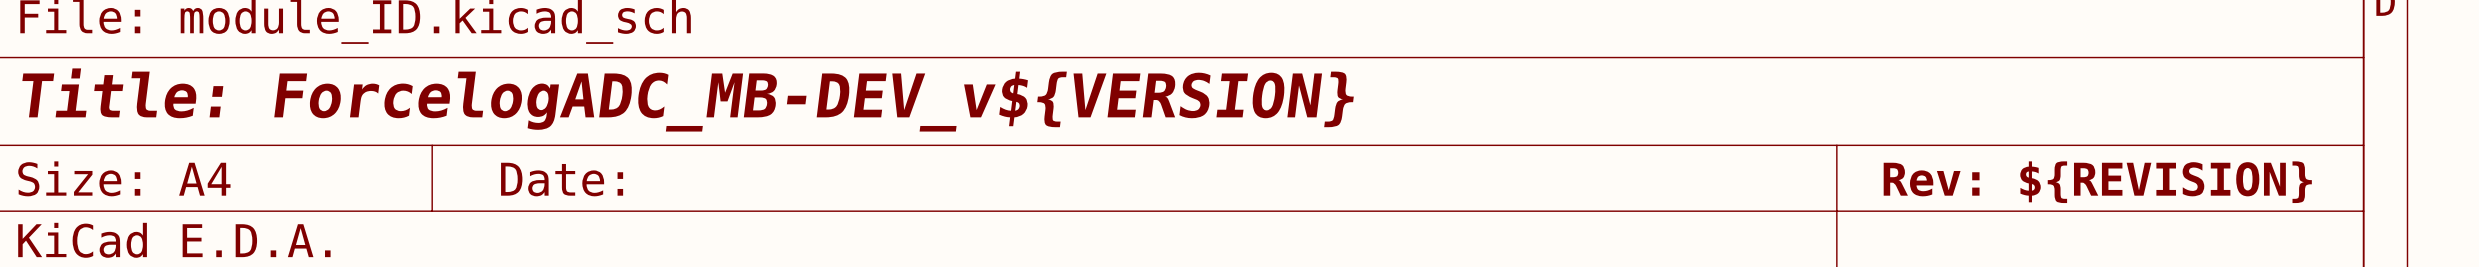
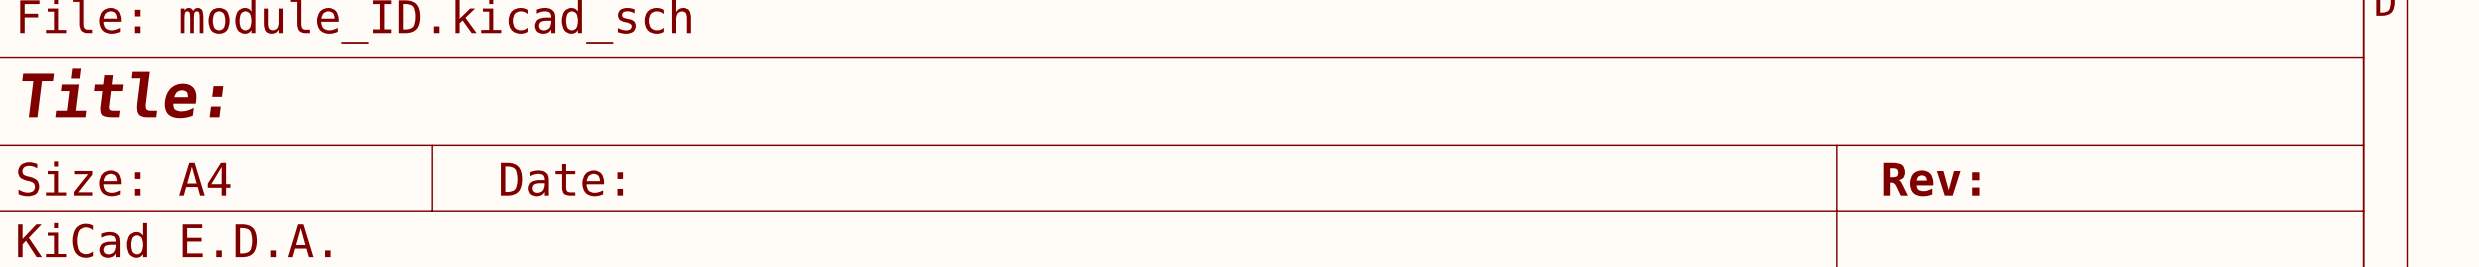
title block: Title: ForcelogADC_MB-DEV_v${VERSION} (688, 99) -> Title: (122, 93)
title block: Rev: ${REVISION} (2097, 182) -> Rev: (1931, 179)

